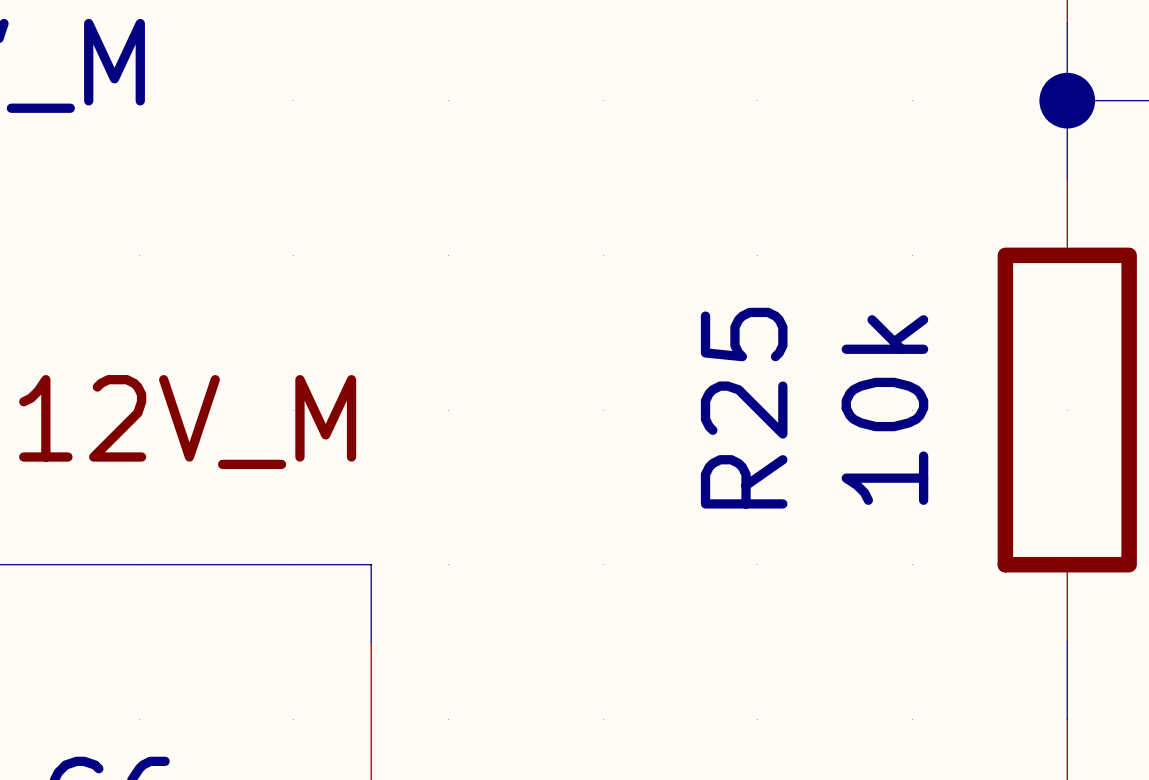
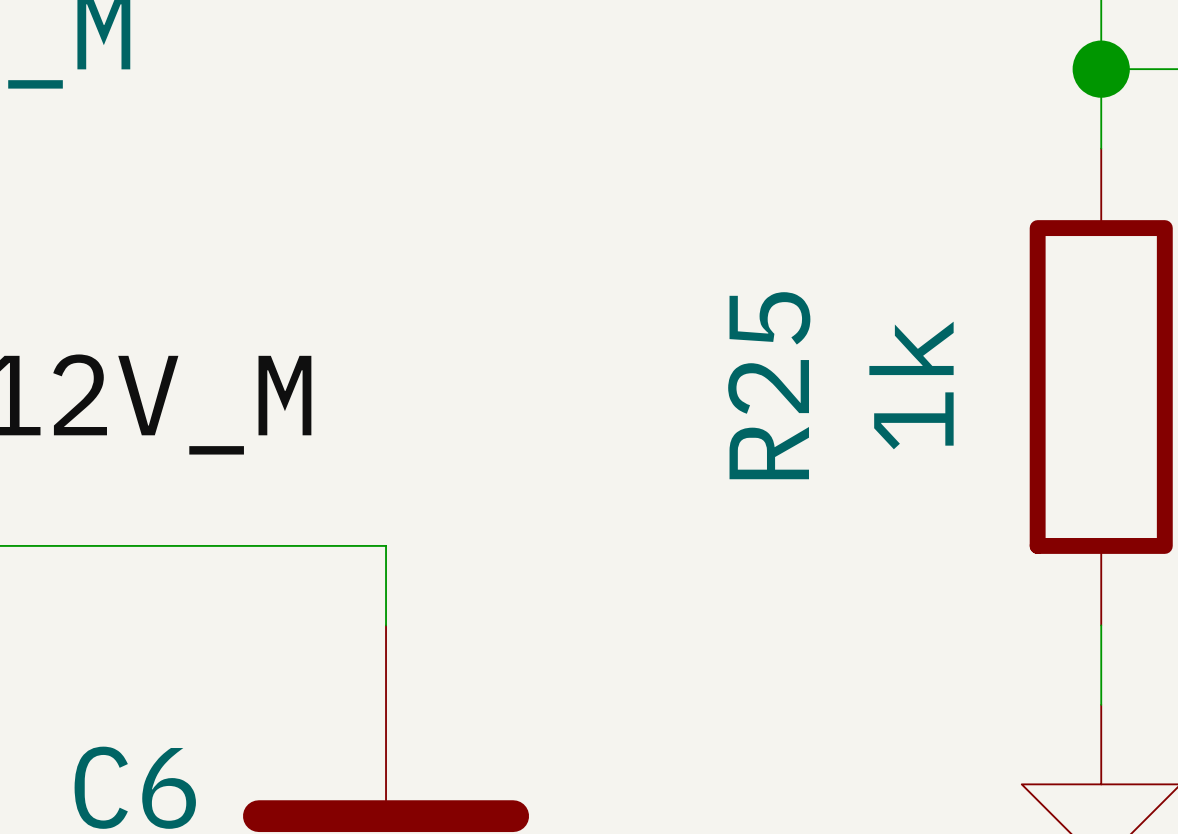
R25 value: 10k (884, 410) -> 1k (911, 385)

